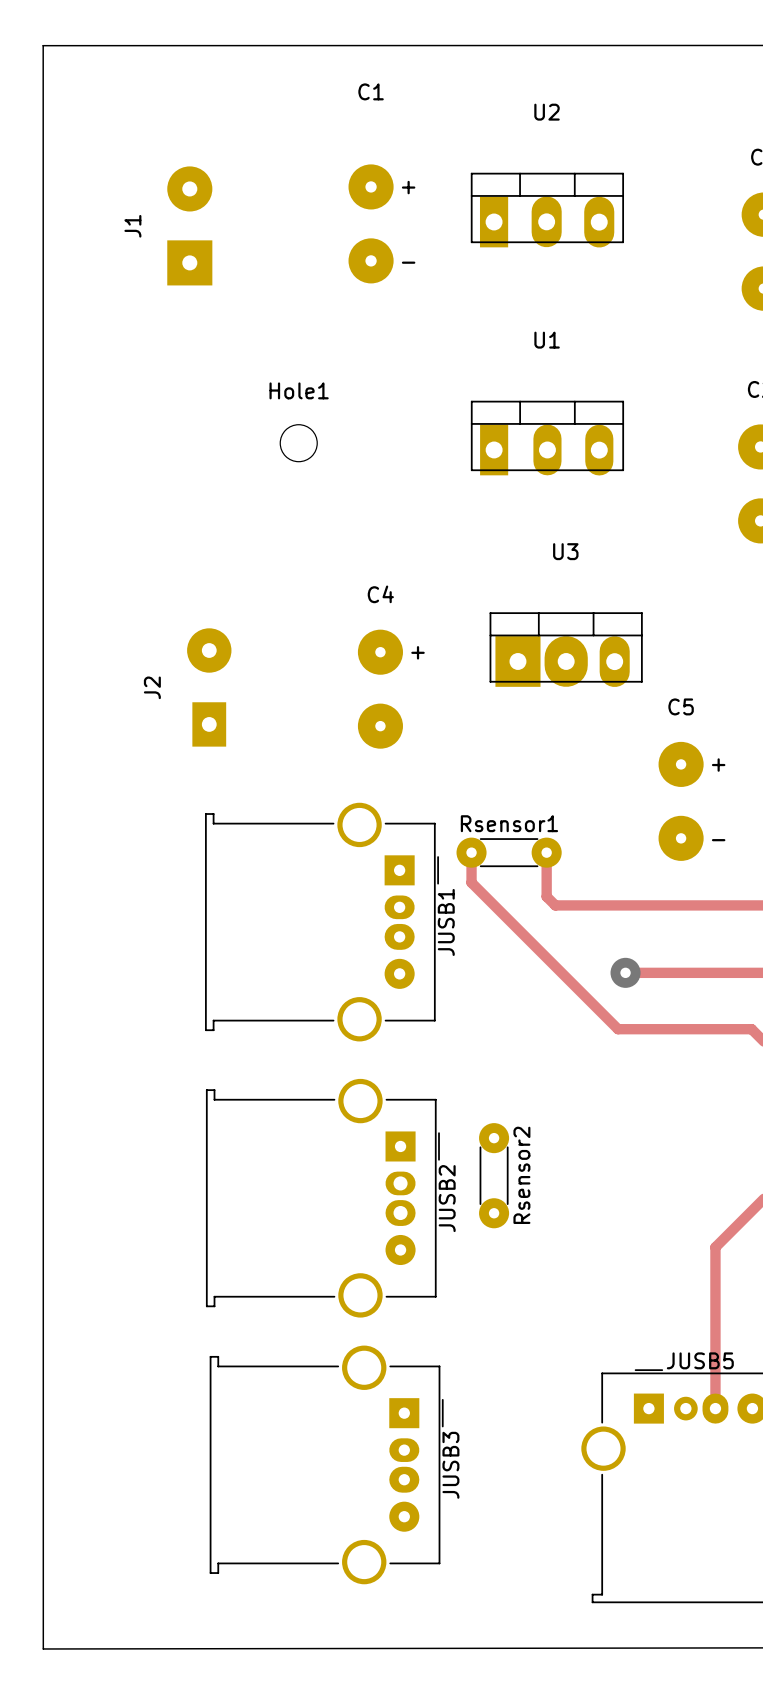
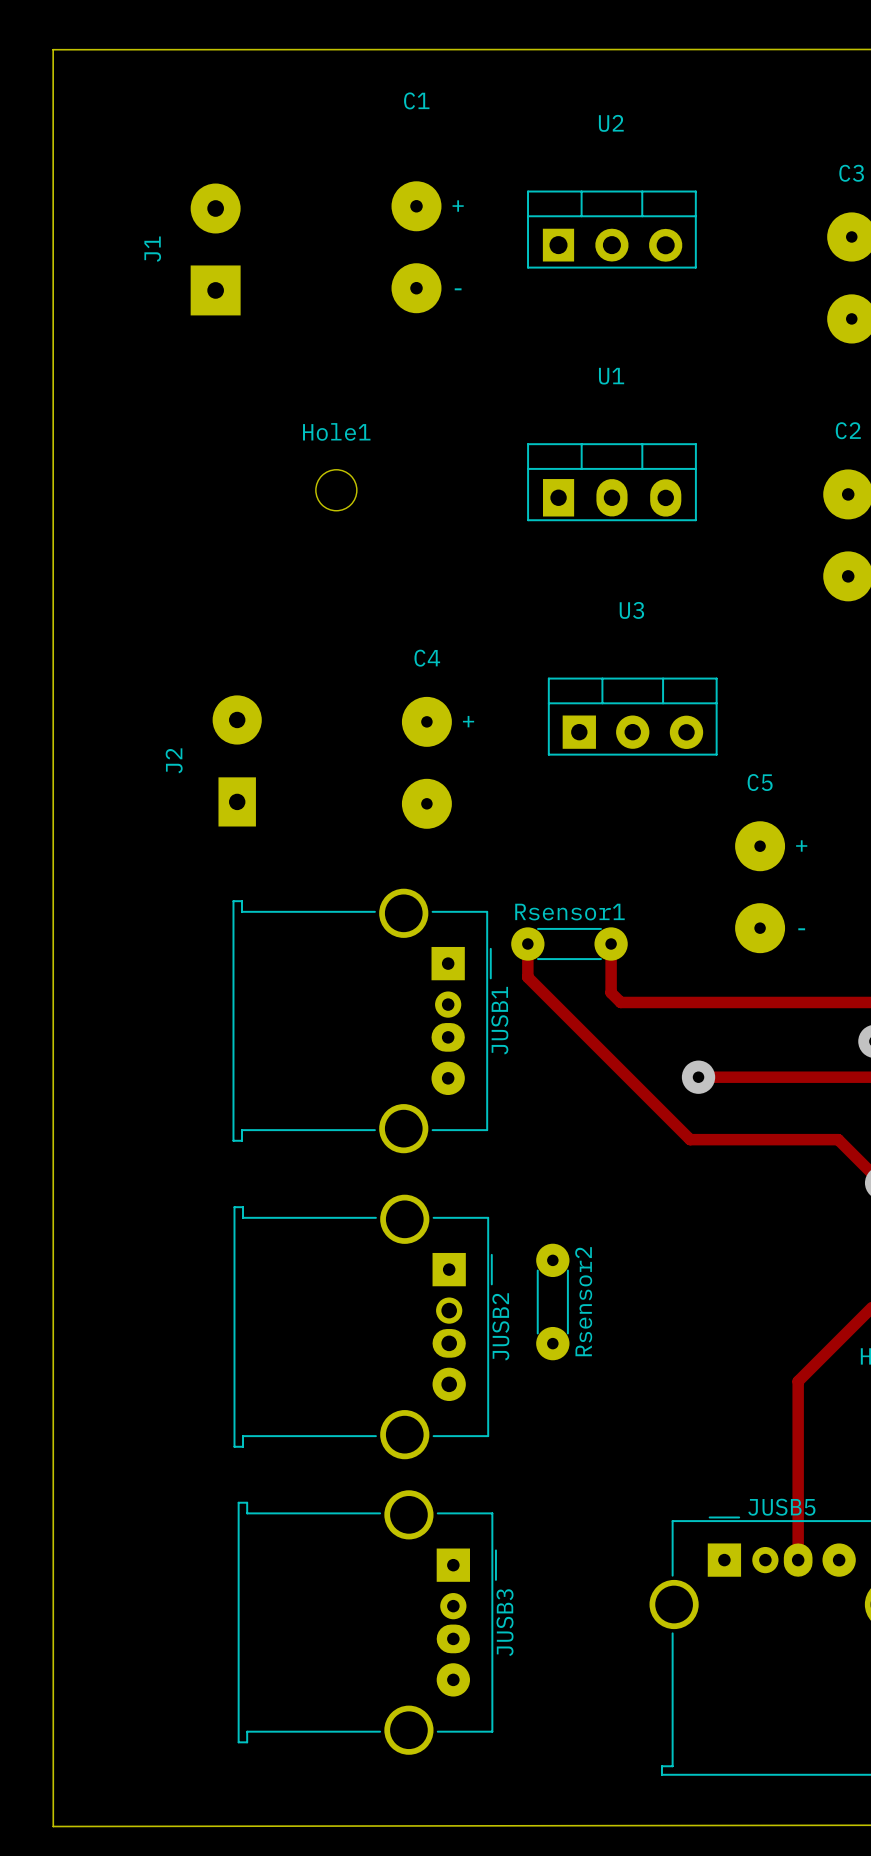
U2 footprint: [470, 172, 625, 248] -> [527, 190, 697, 269]
U1 footprint: [470, 400, 625, 476] -> [527, 443, 697, 522]
U3 footprint: [489, 612, 643, 687] -> [547, 677, 718, 756]
JUSB1 footprint: [205, 802, 439, 1042] -> [232, 888, 492, 1154]
JUSB2 footprint: [205, 1078, 440, 1318] -> [233, 1194, 493, 1460]
JUSB3 footprint: [209, 1345, 444, 1585] -> [237, 1490, 497, 1755]

